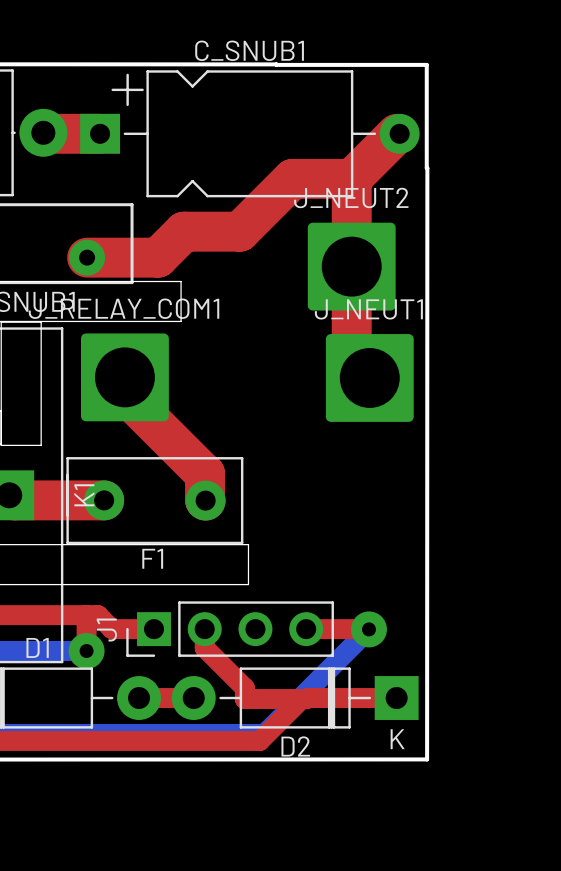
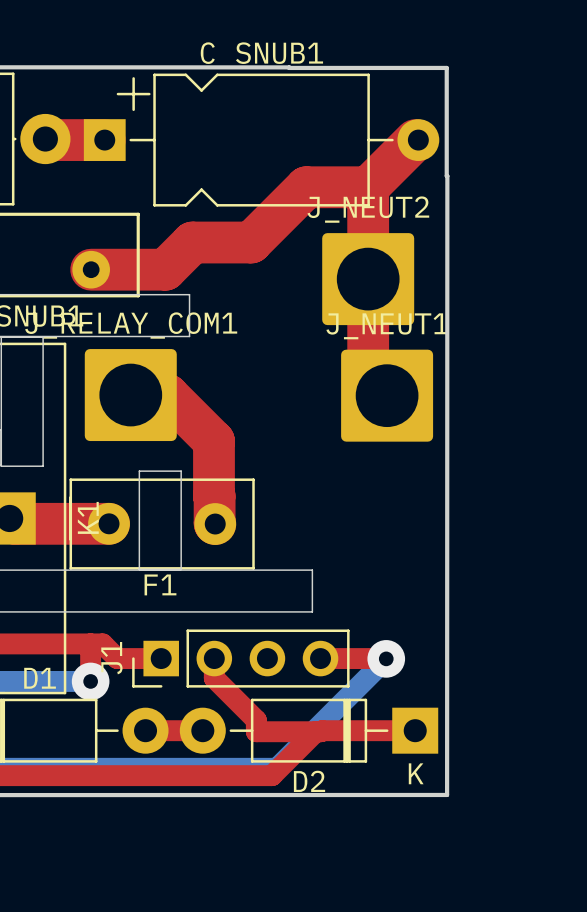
top track: (124, 394) (204, 473) -> (132, 395) (167, 395) (213, 441) (213, 496)
board edge: none -> (139, 471) (181, 471) (181, 569) (139, 569) (139, 471)
board edge: (248, 544) (248, 584) -> (260, 570) (312, 570) (312, 611) (260, 611)

